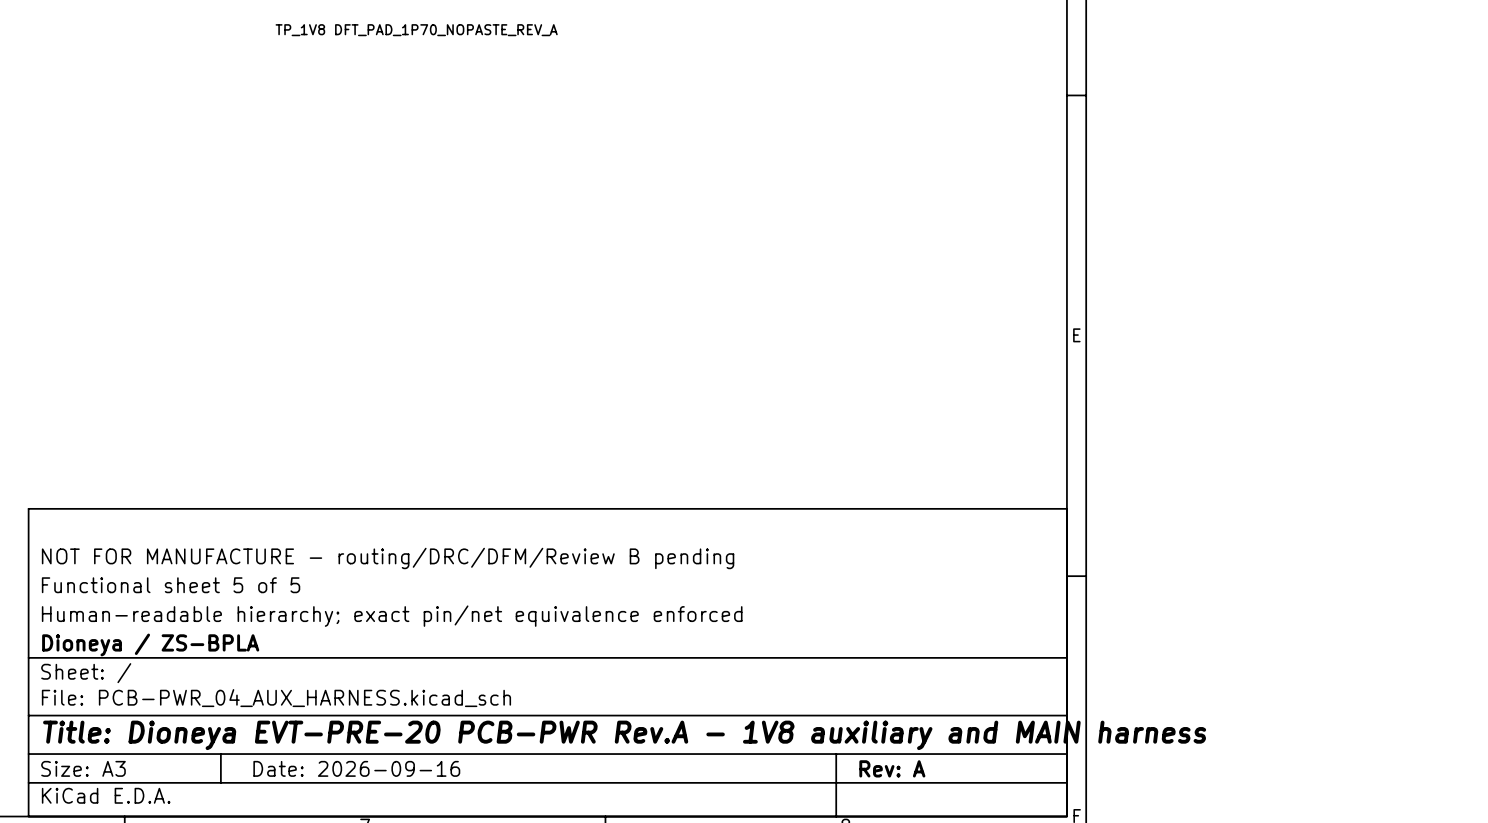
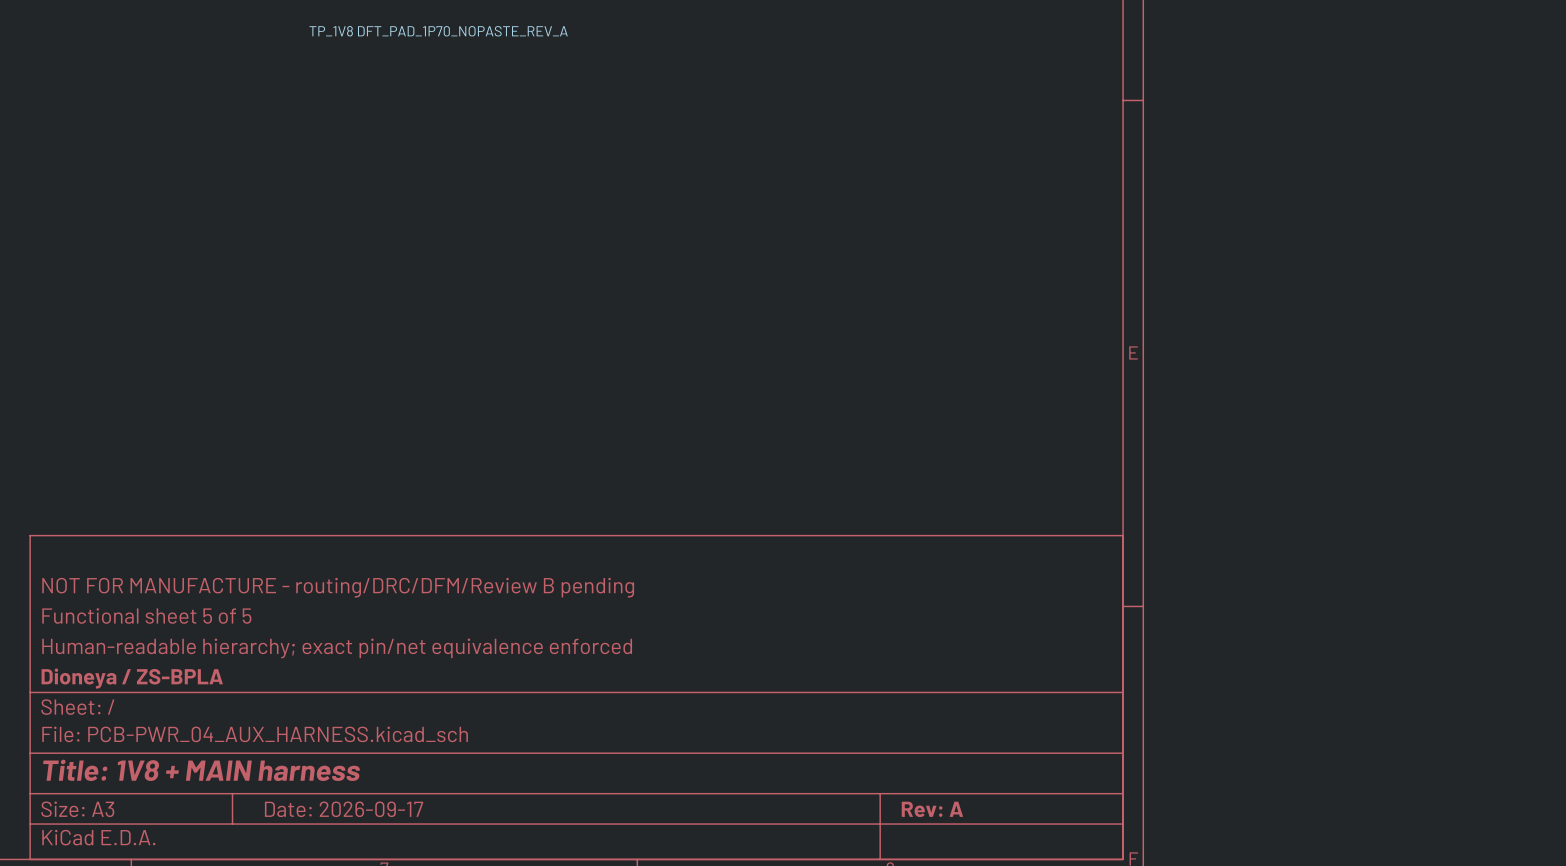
title block: Title: Dioneya EVT-PRE-20 PCB-PWR Rev.A - 1V8 auxiliary and MAIN harness (624, 735) -> Title: 1V8 + MAIN harness (201, 770)
title block: Date: 2026-09-16 (356, 768) -> Date: 2026-09-17 (344, 809)

